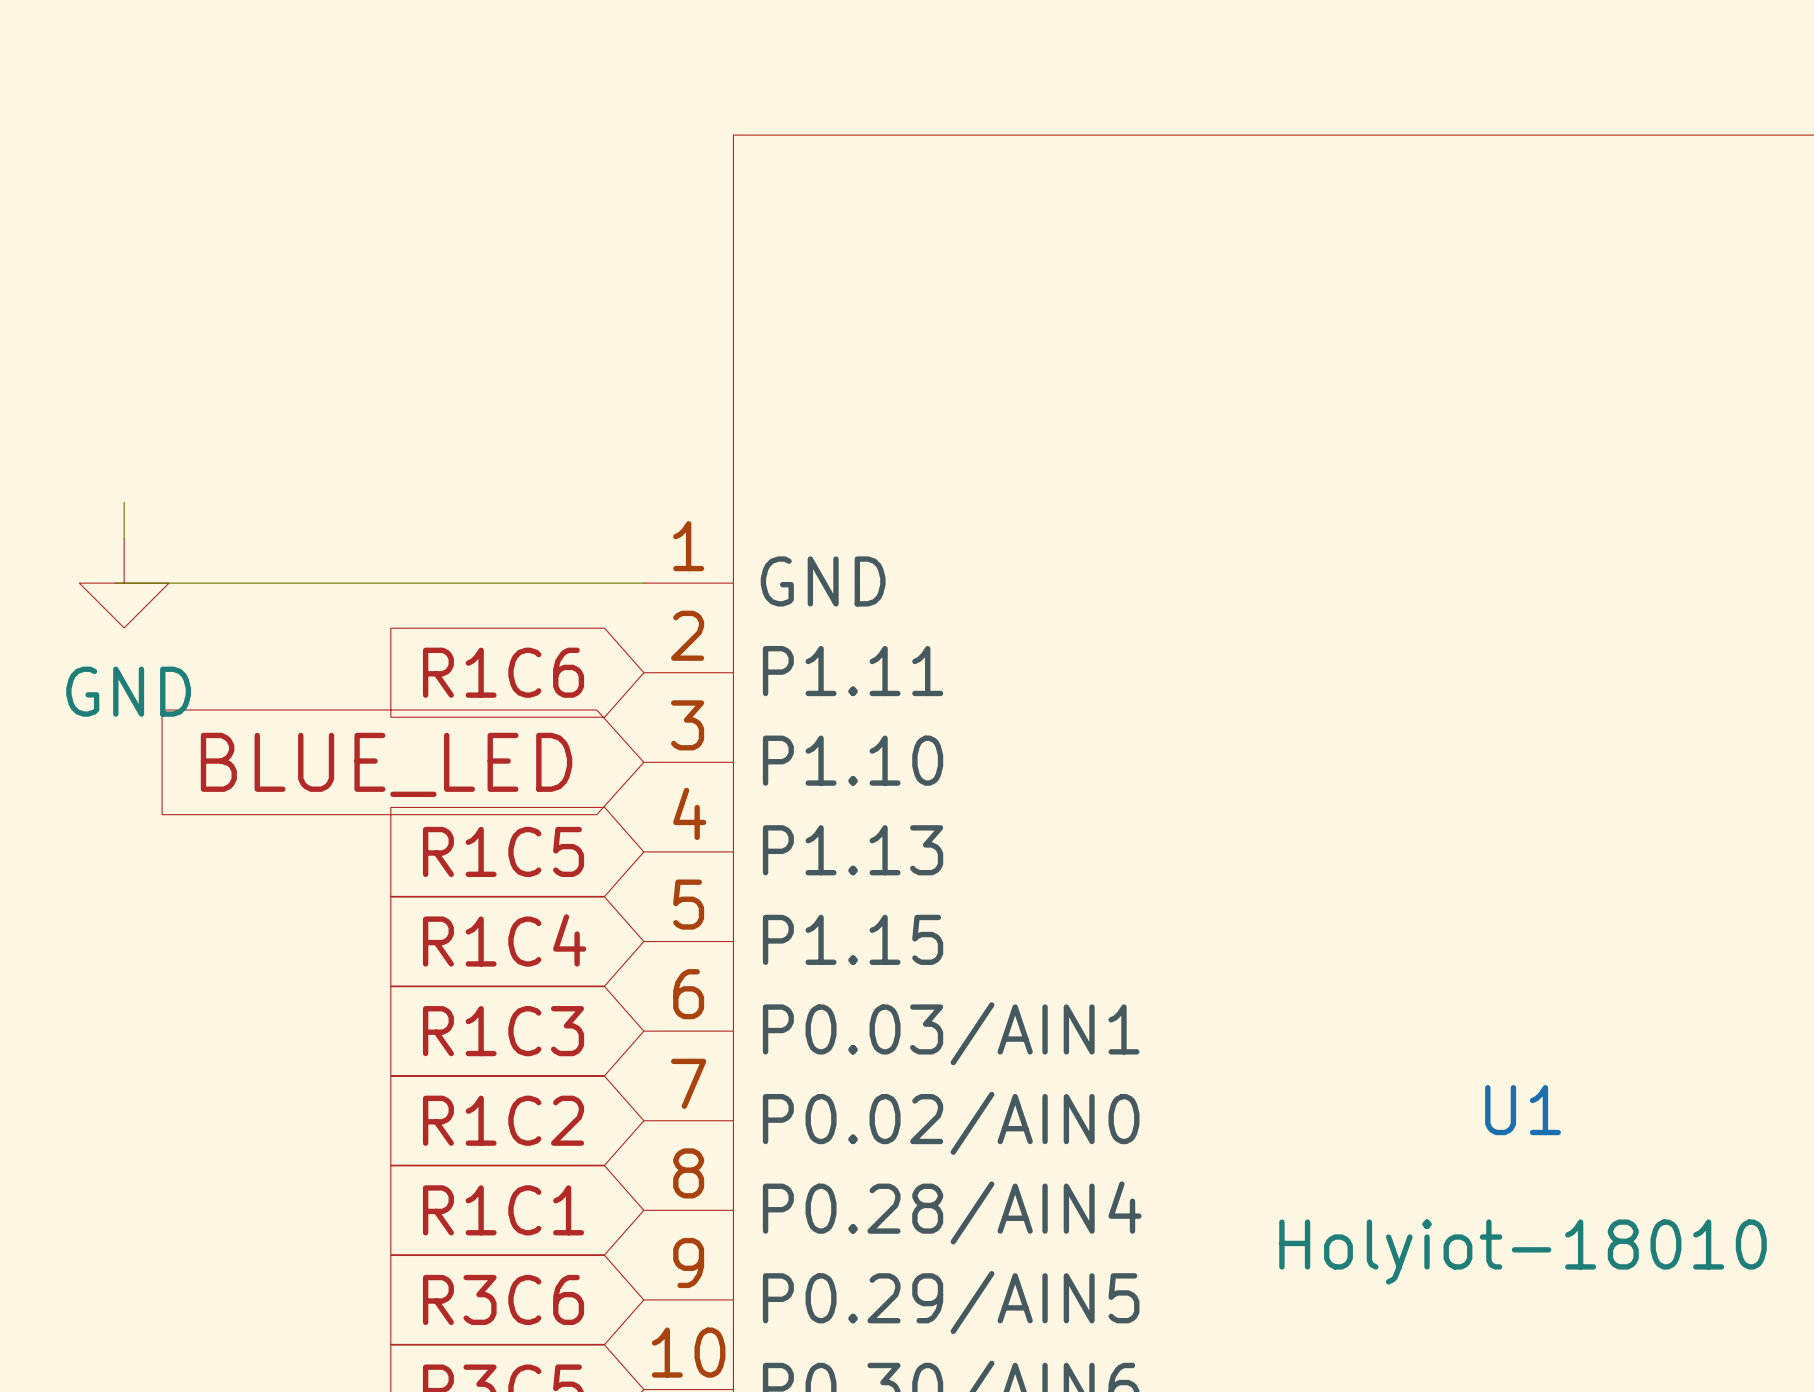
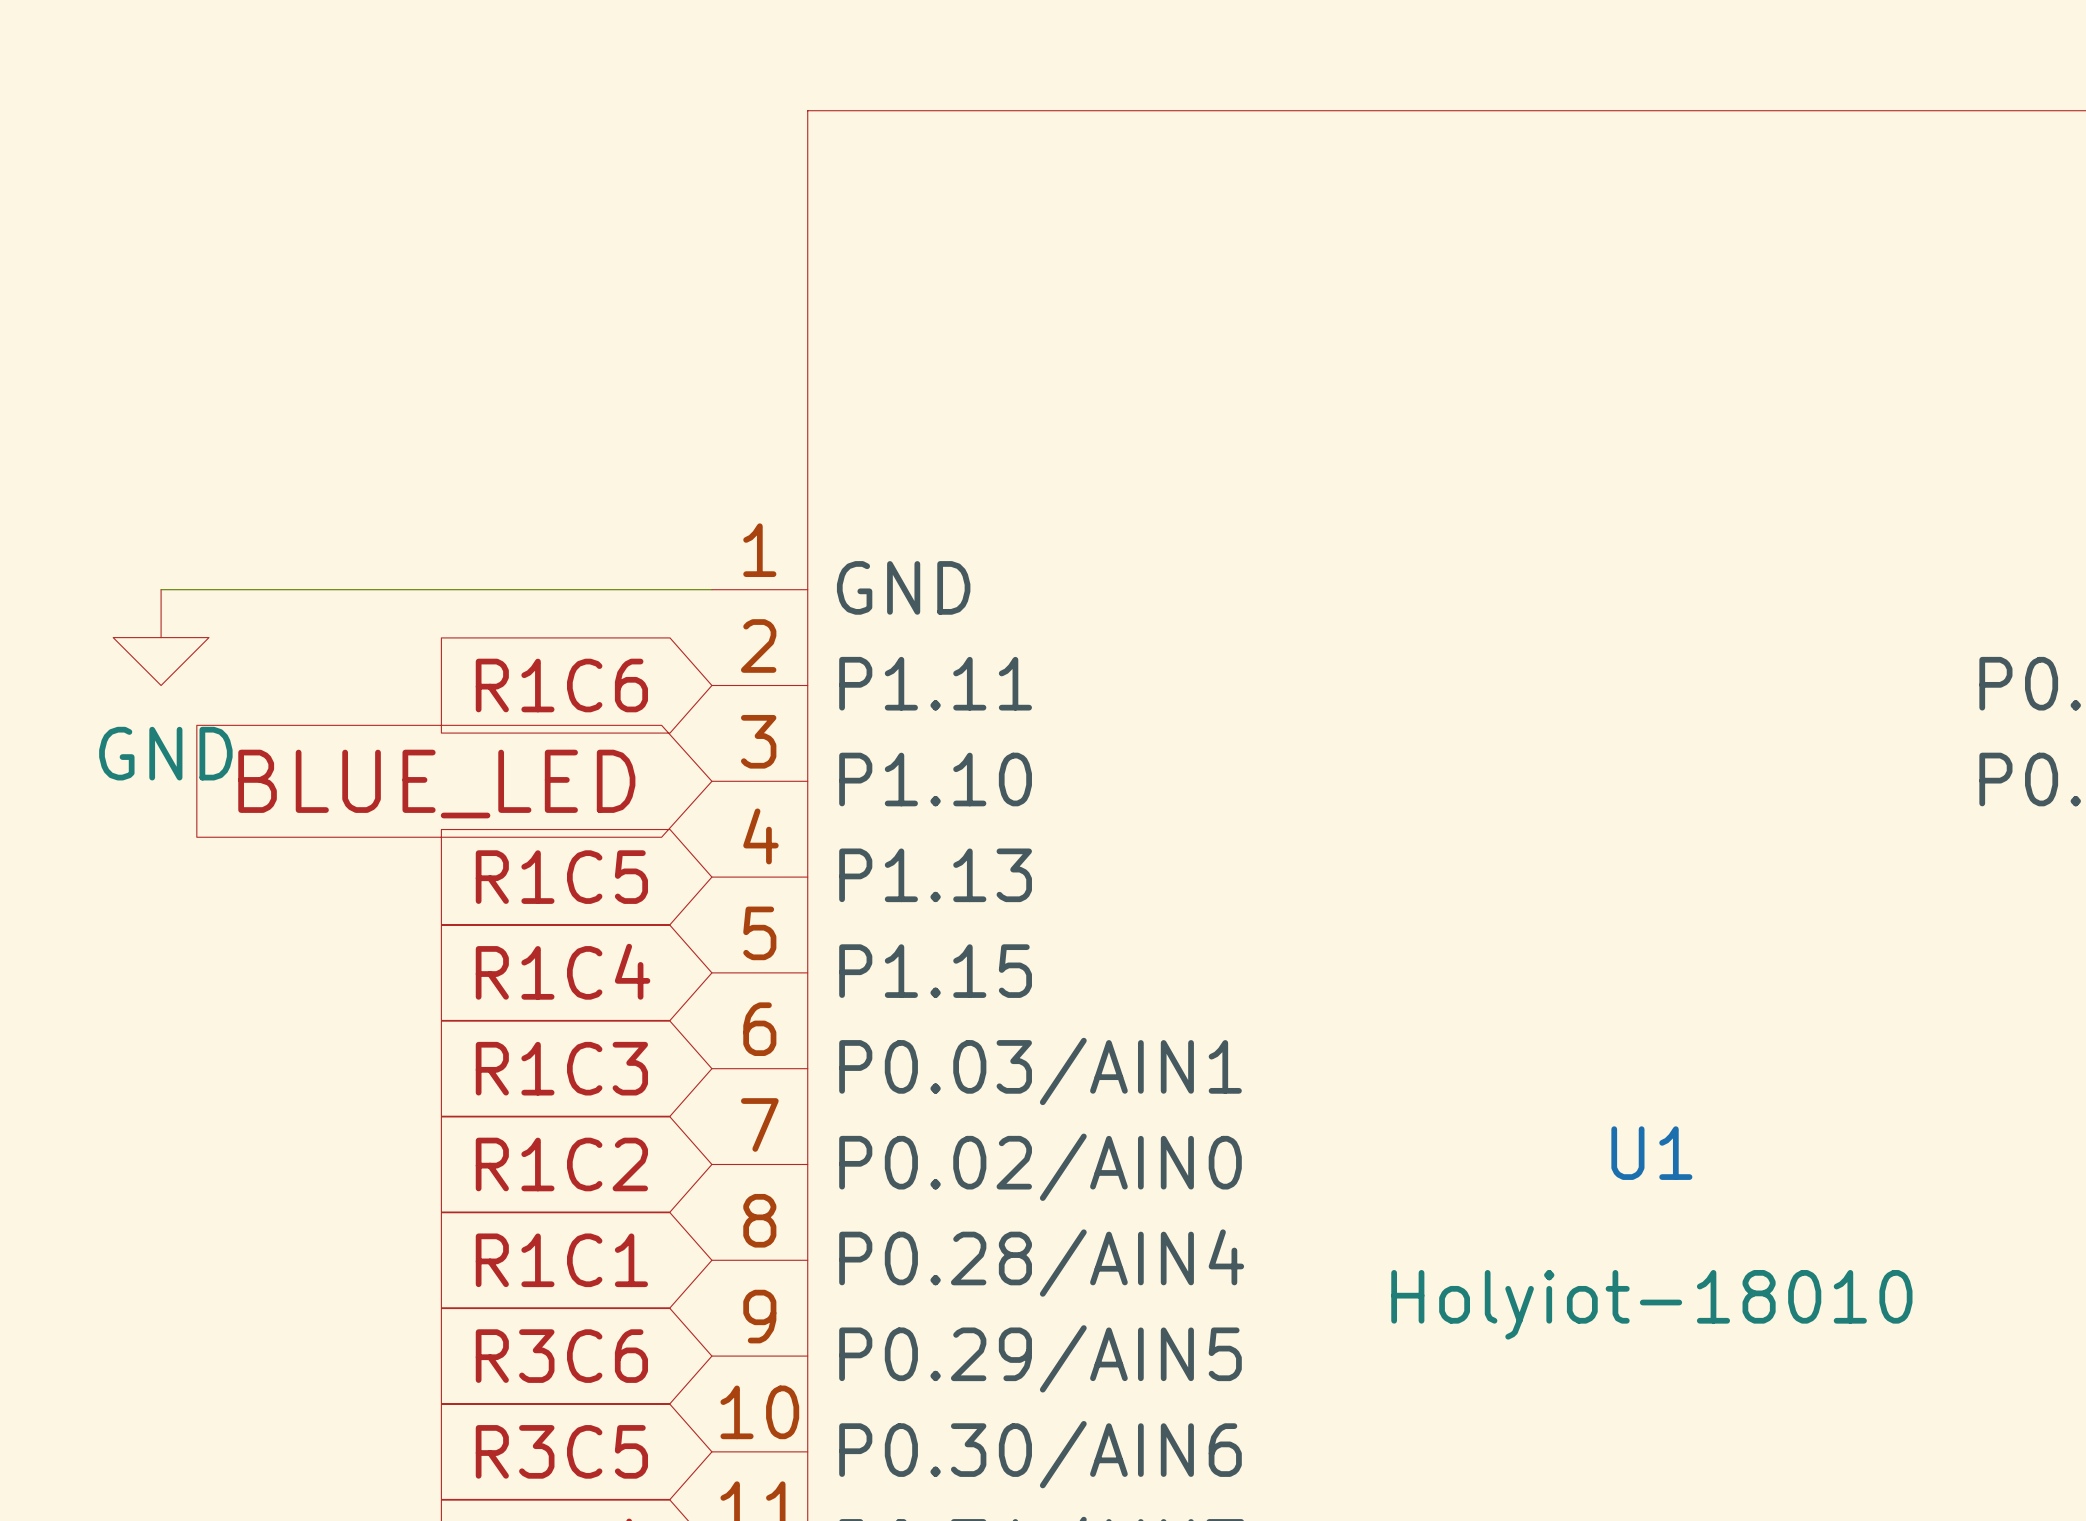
wire: (124, 502) (124, 538) -> none
wire: (115, 583) (128, 583) -> none
power symbol position: GND (124, 583) -> GND (161, 637)

